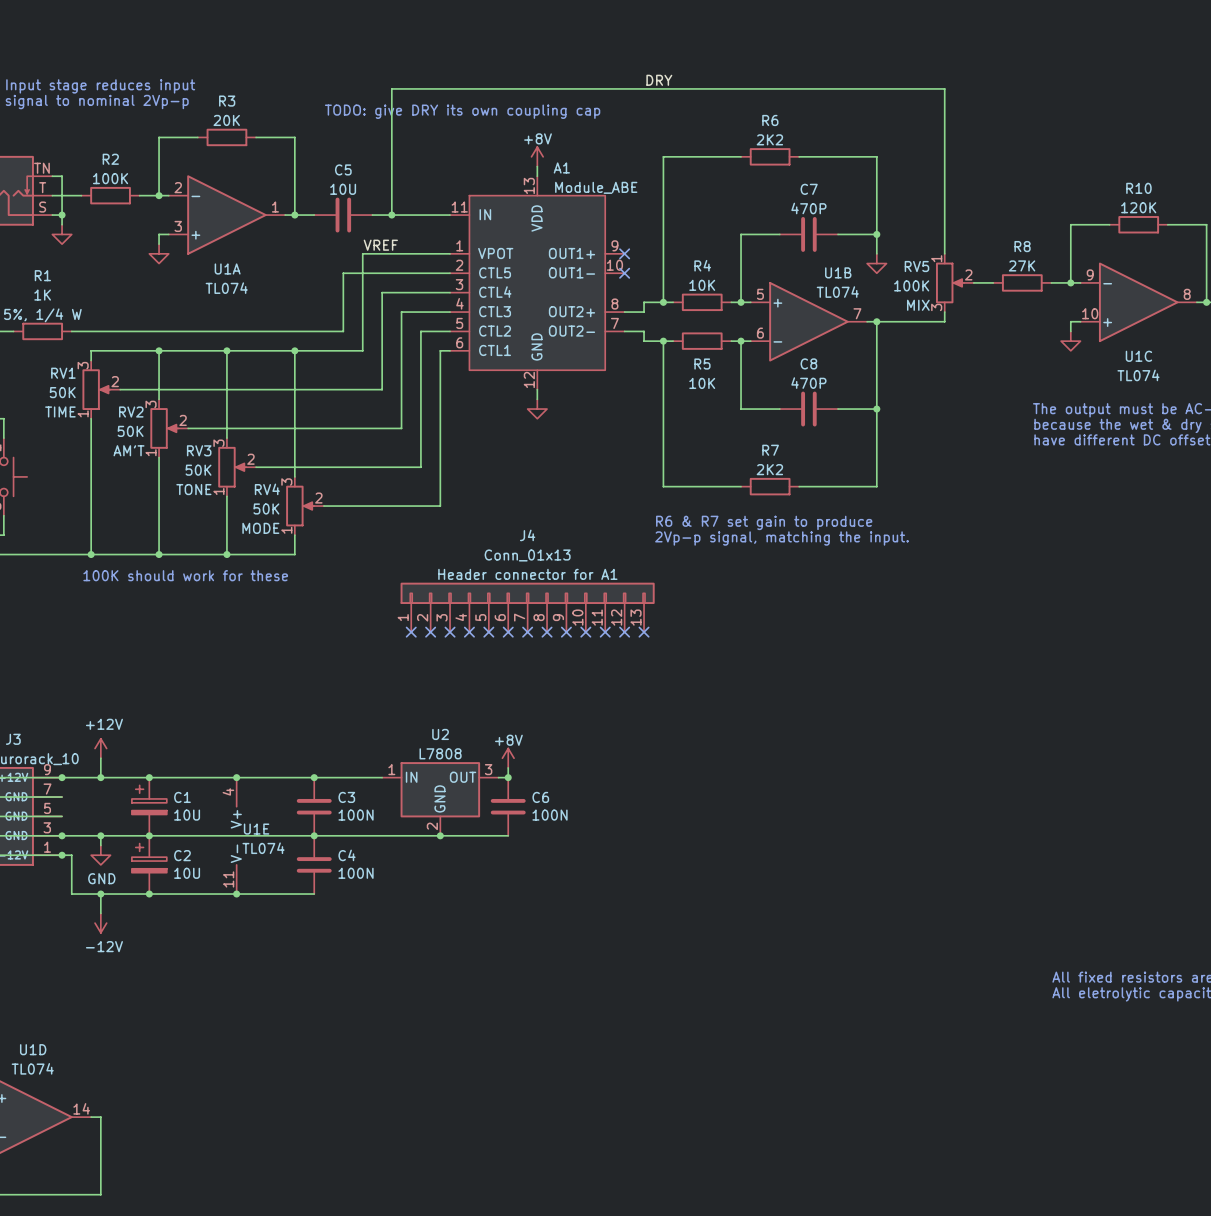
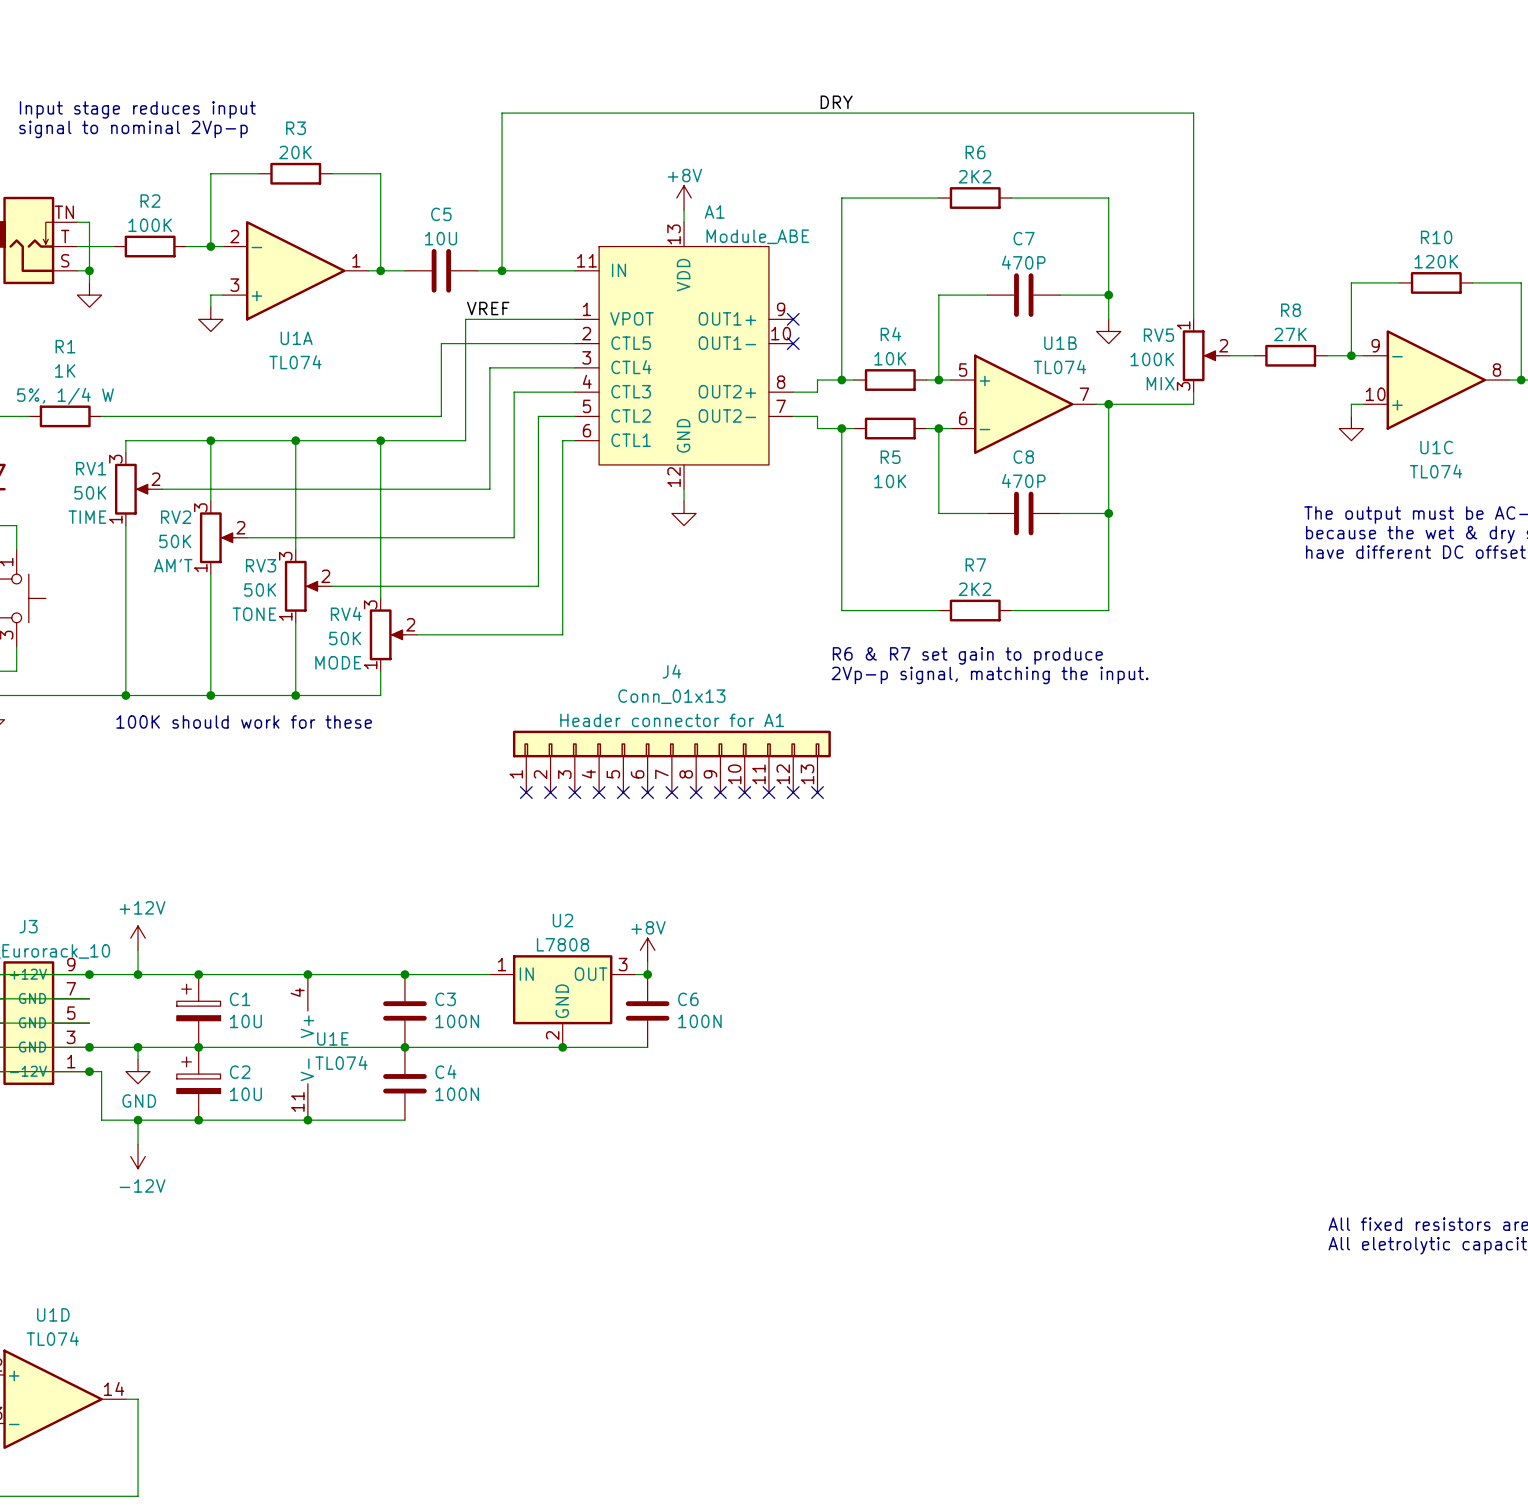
text: TODO: give DRY its own coupling cap (462, 111) -> none

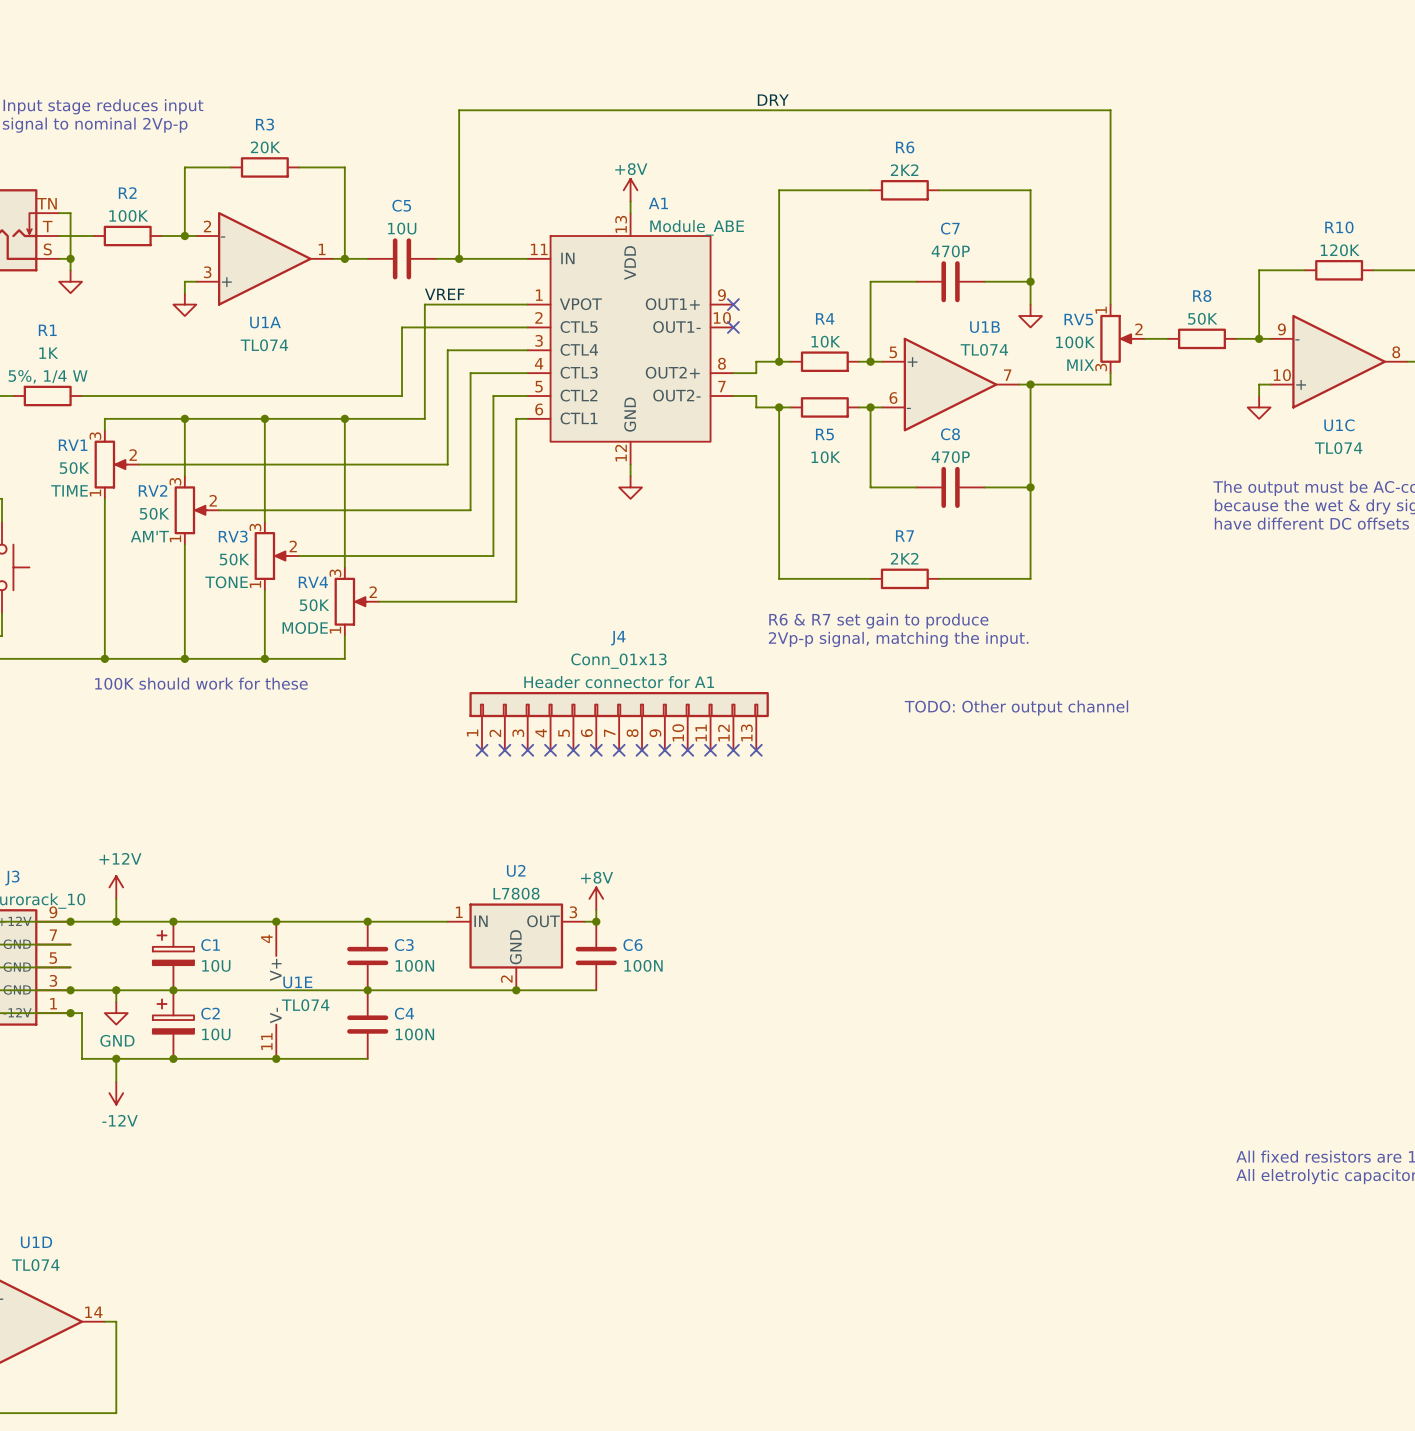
R8 value: 27K (1290, 334) -> 50K (1202, 318)
text: none -> TODO: Other output channel (1016, 708)

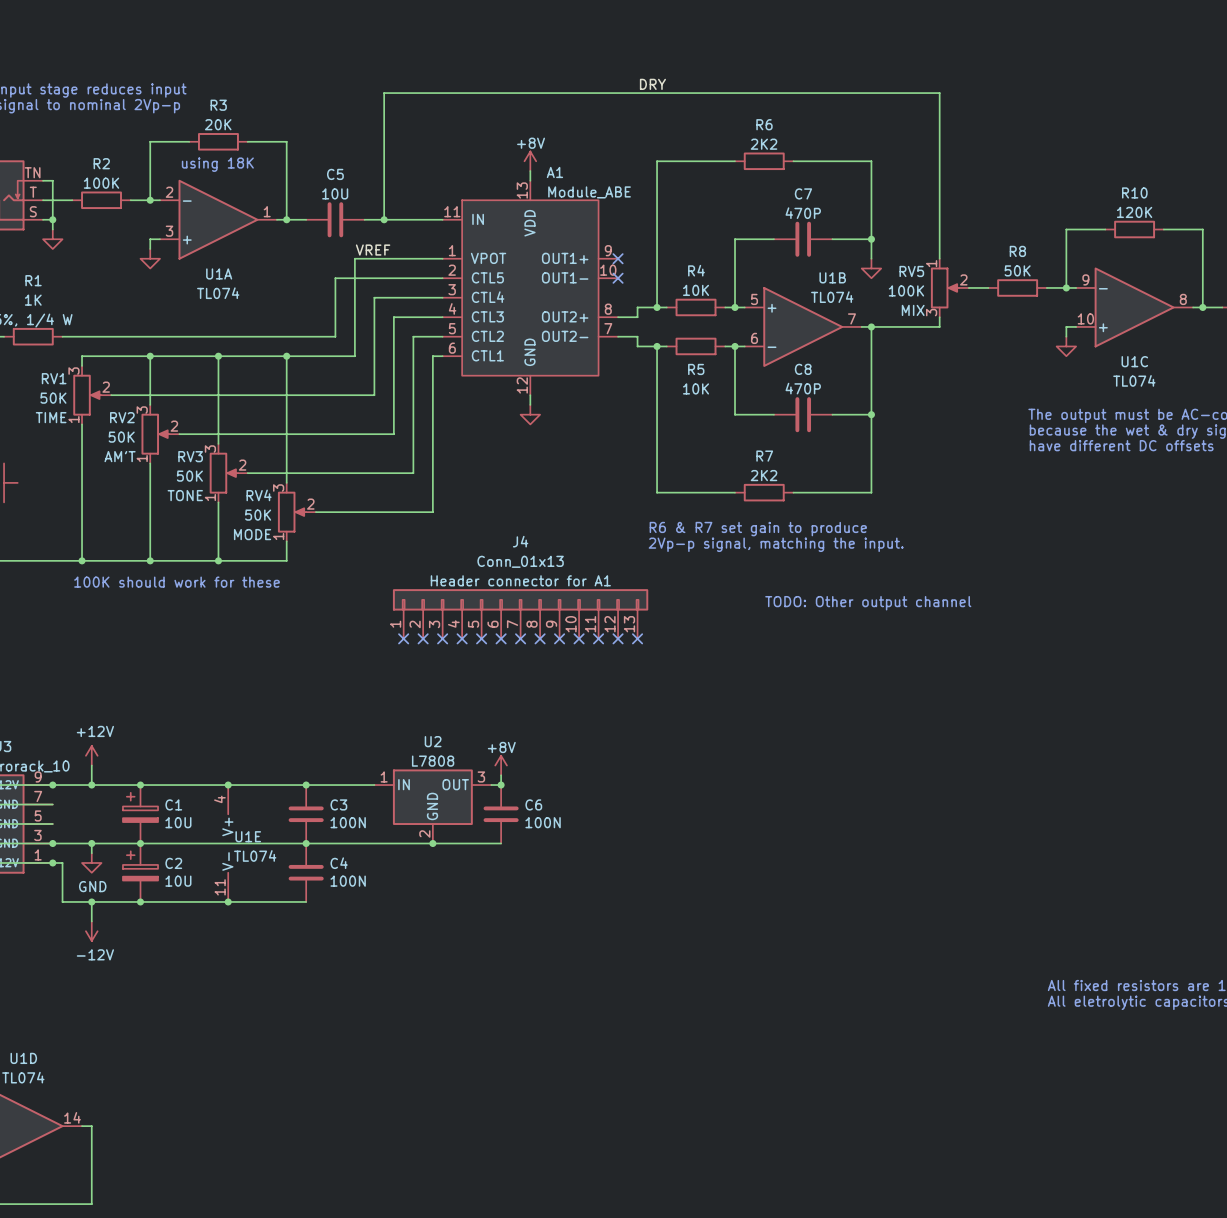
text: none -> using 18K (217, 164)

